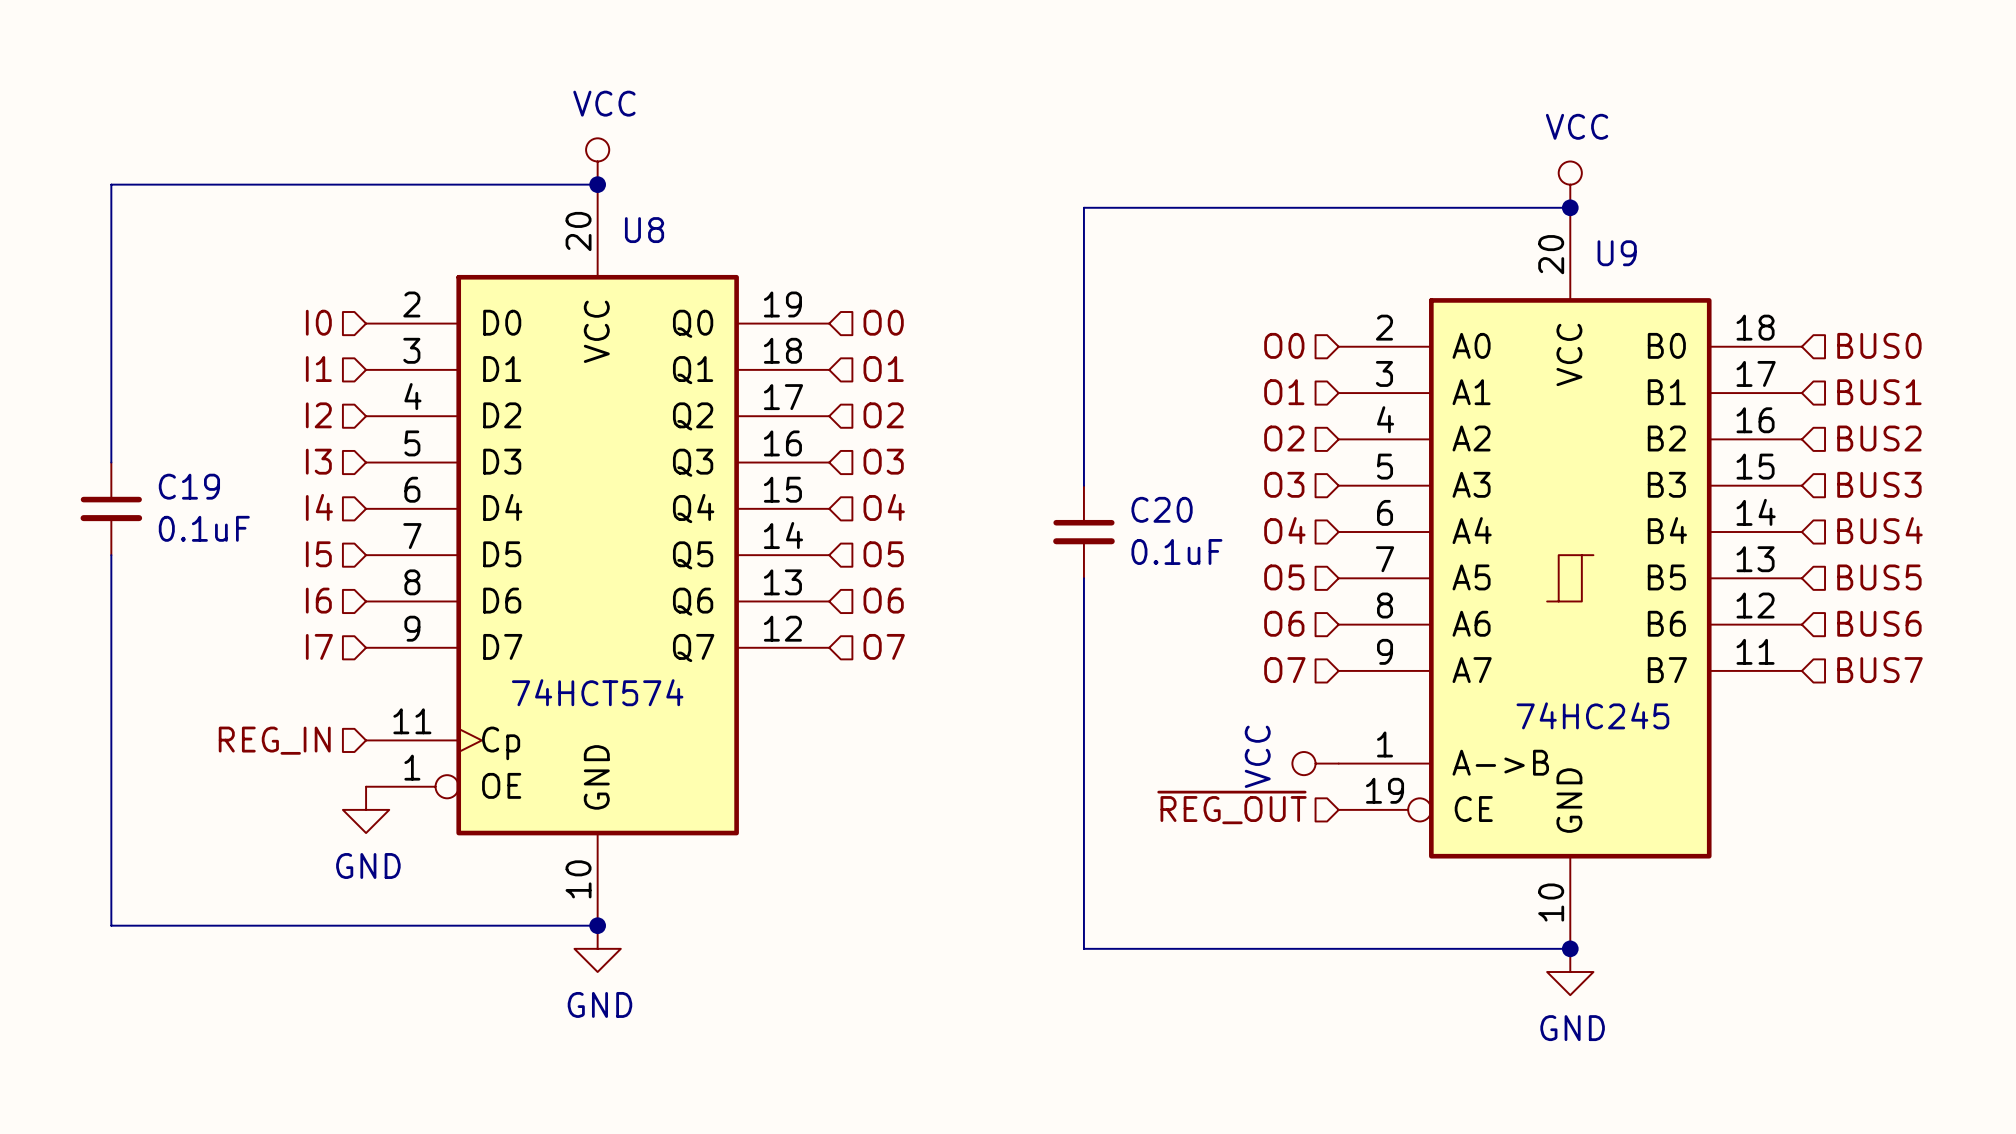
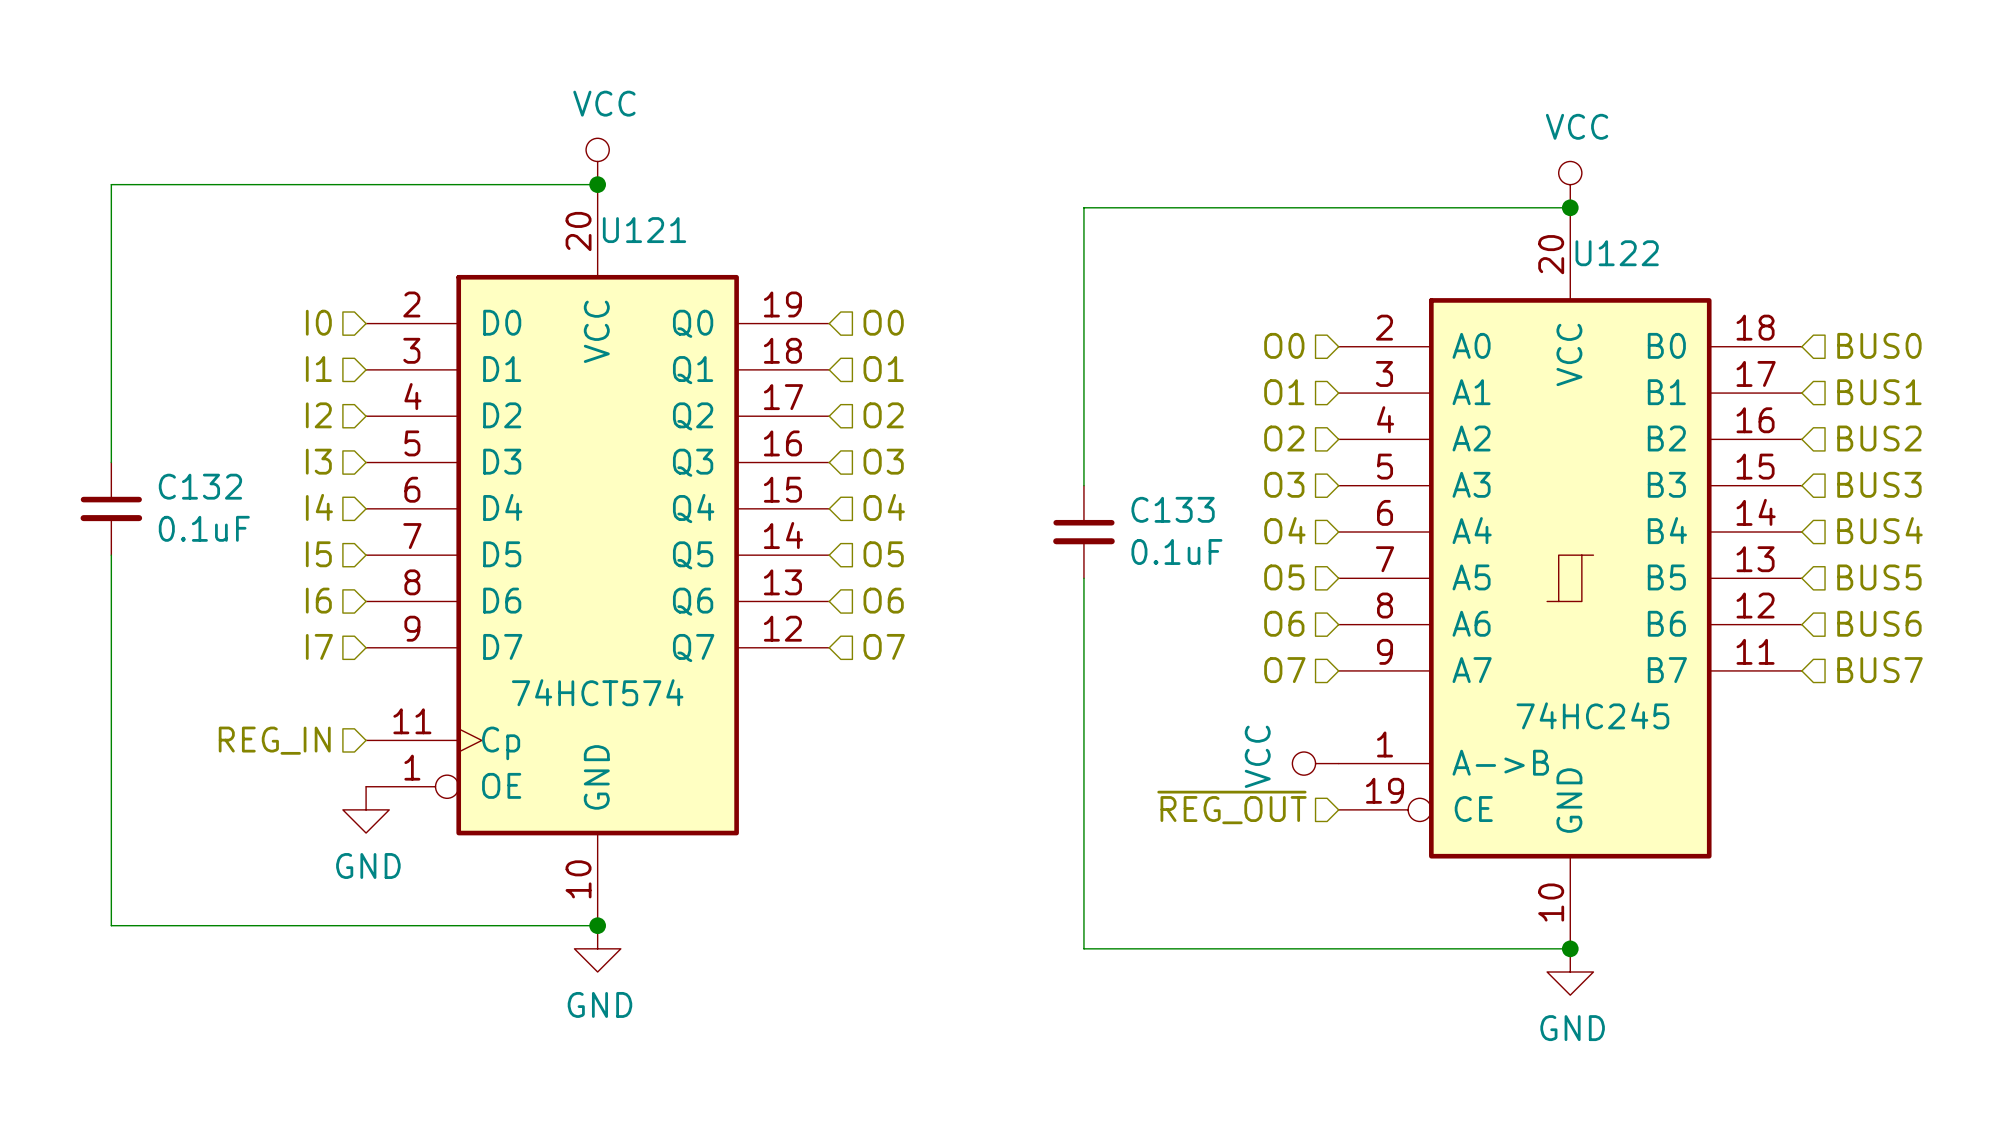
U8 name: U8 (644, 230) -> U121 (644, 230)
U9 name: U9 (1617, 253) -> U122 (1617, 253)
C19 name: C19 (189, 486) -> C132 (200, 486)
C20 name: C20 (1162, 509) -> C133 (1173, 509)

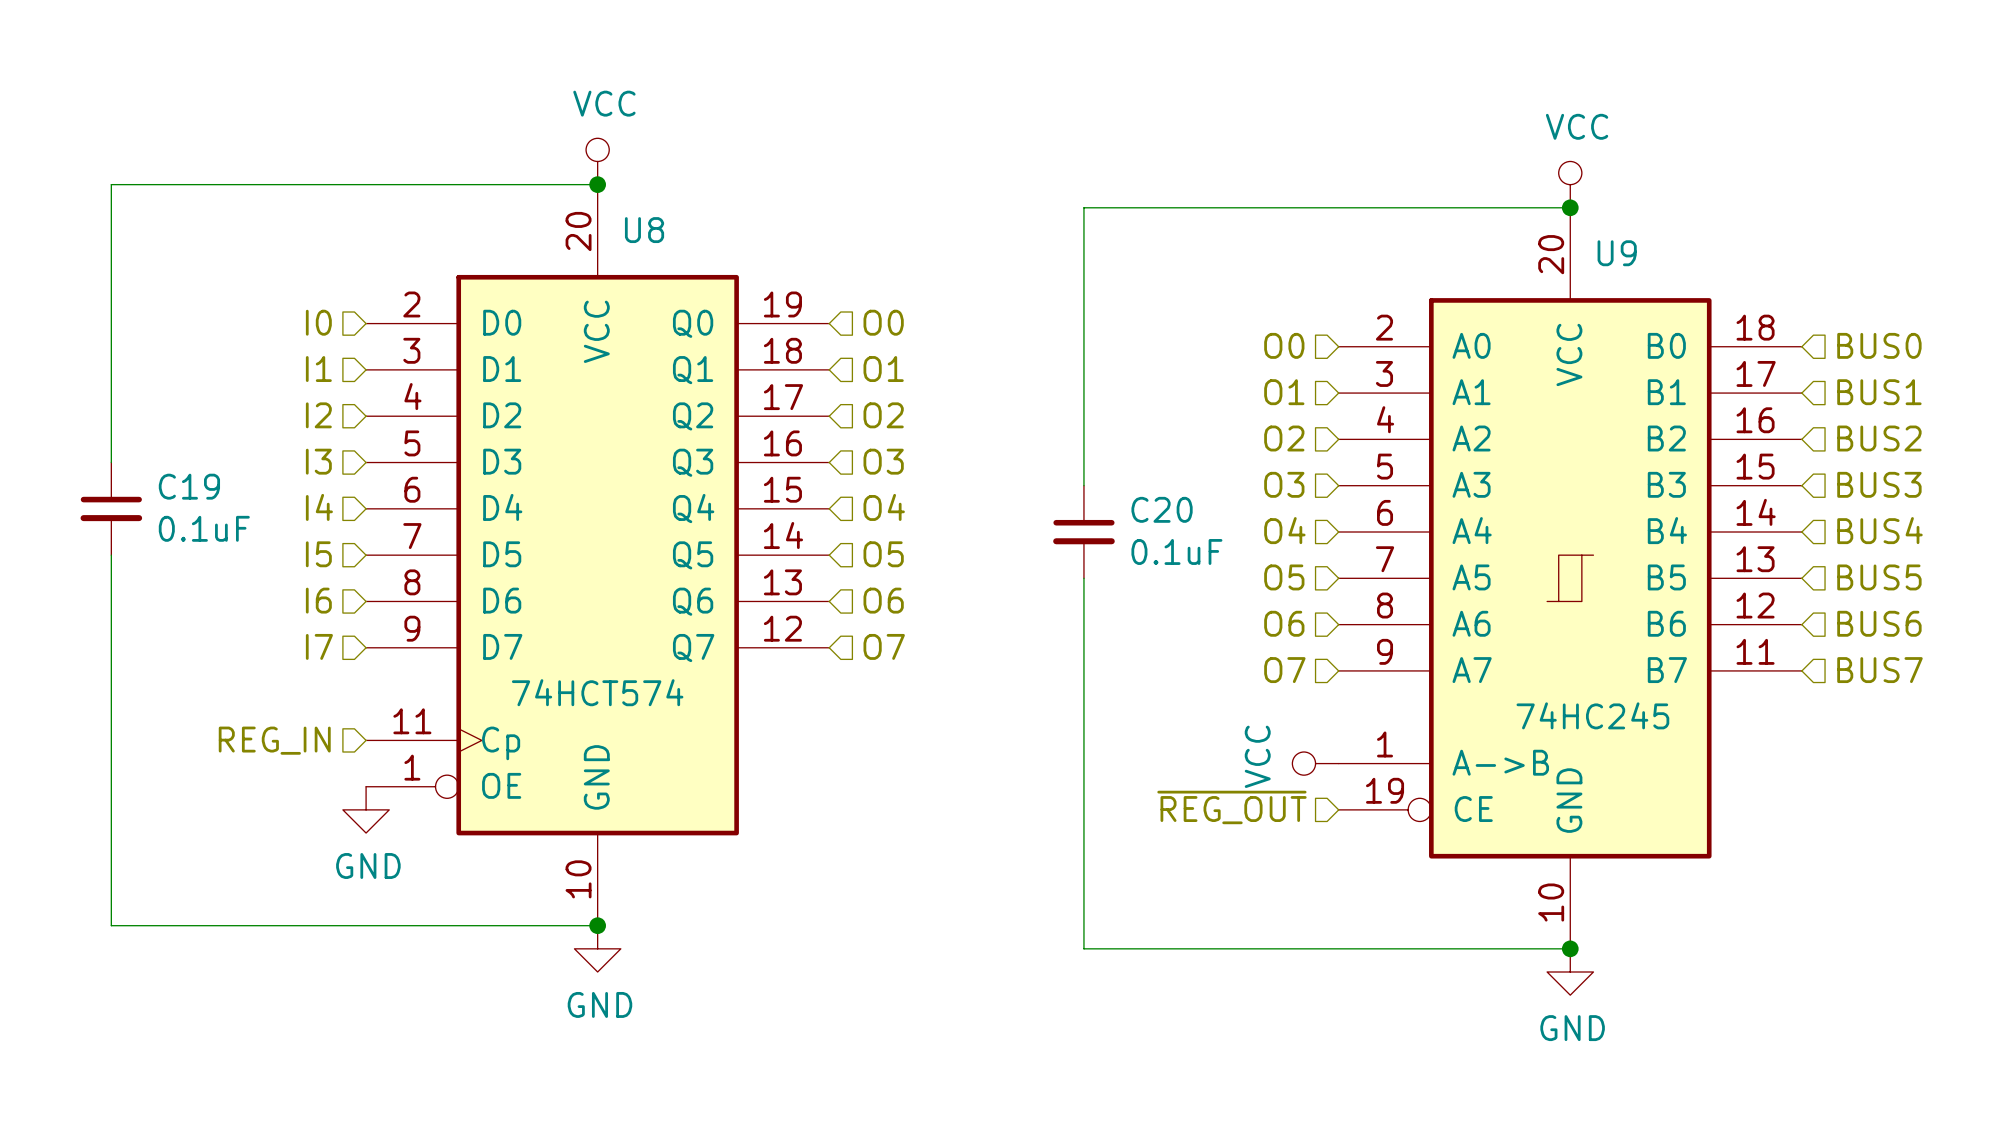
U121 name: U121 (644, 230) -> U8 (644, 230)
U122 name: U122 (1617, 253) -> U9 (1617, 253)
C132 name: C132 (200, 486) -> C19 (189, 486)
C133 name: C133 (1173, 509) -> C20 (1162, 509)

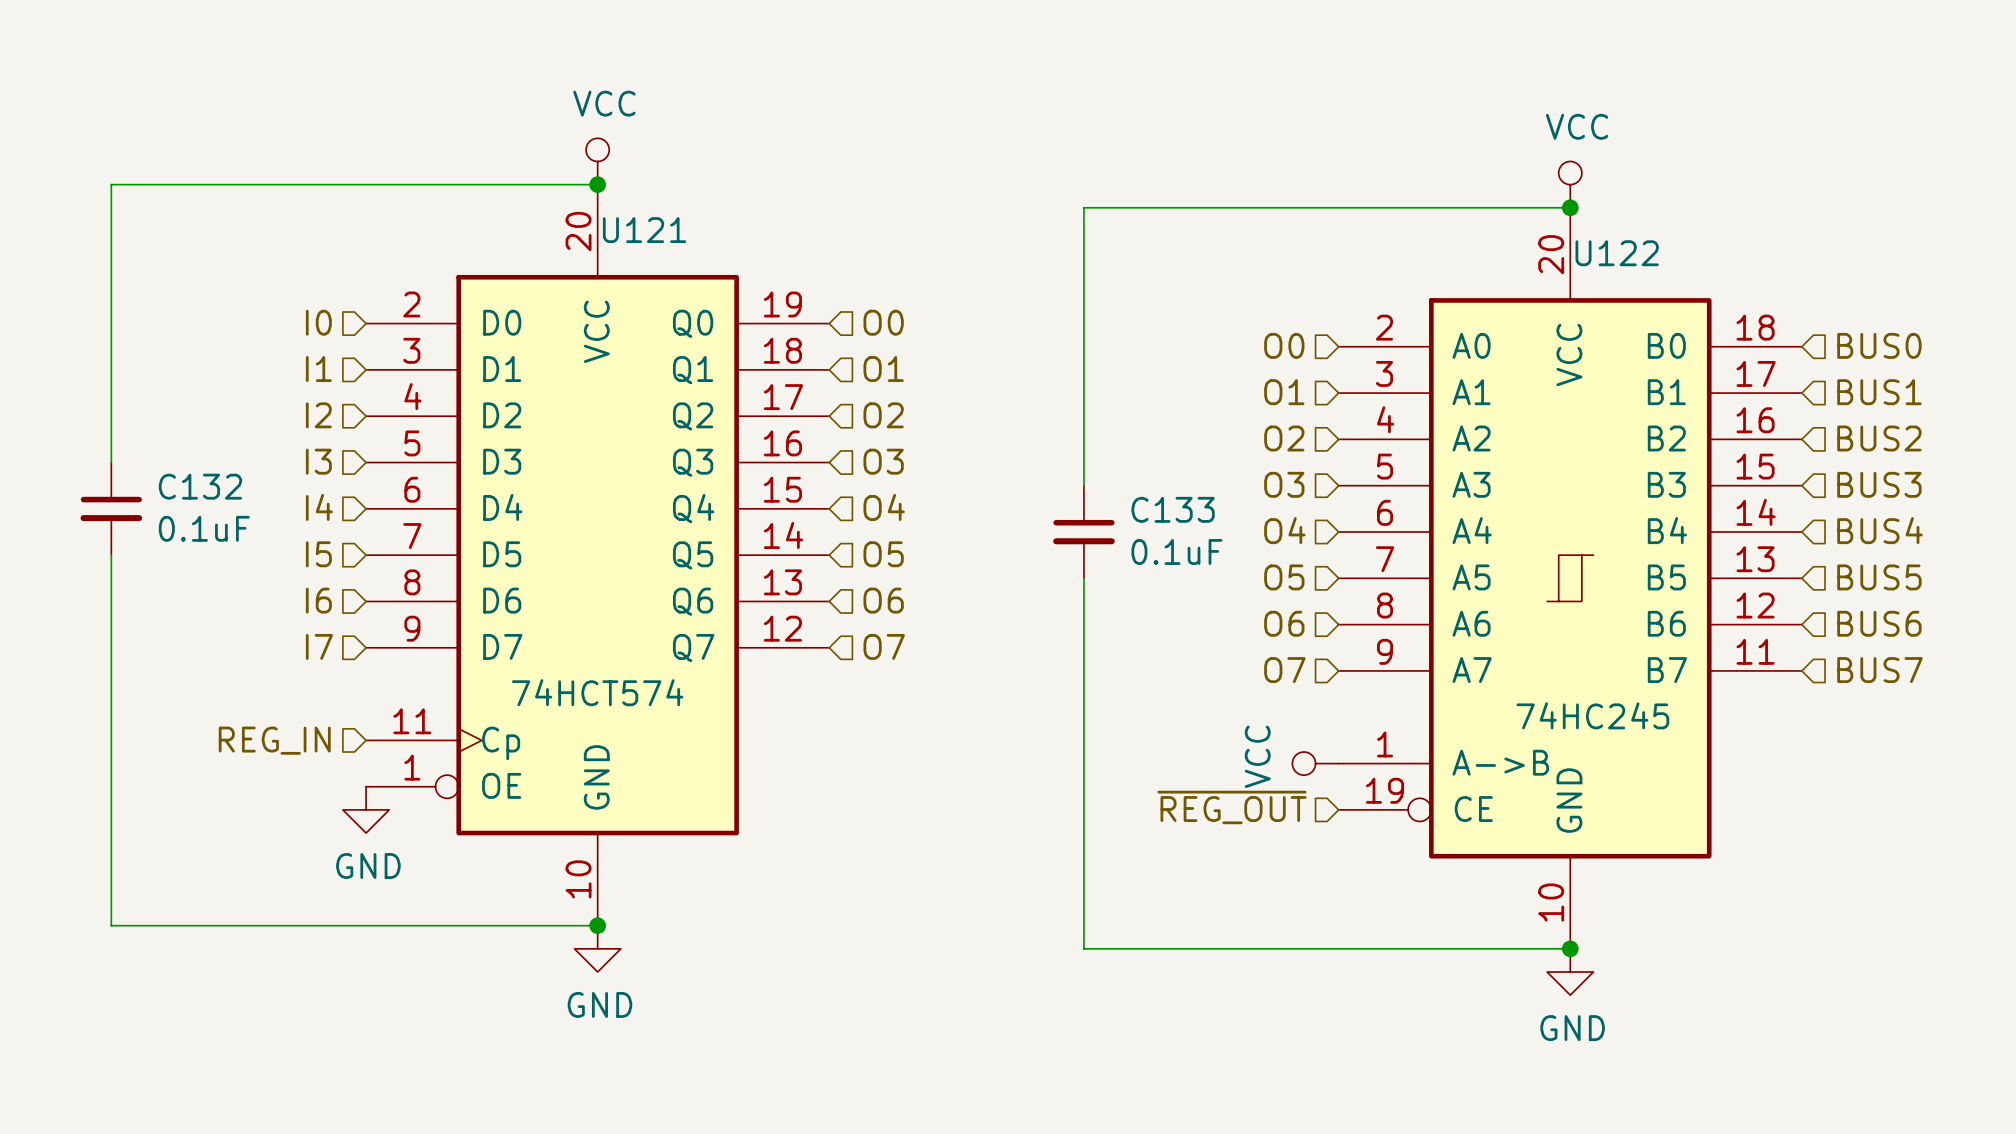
U8 name: U8 (644, 230) -> U121 (644, 230)
U9 name: U9 (1617, 253) -> U122 (1617, 253)
C19 name: C19 (189, 486) -> C132 (200, 486)
C20 name: C20 (1162, 509) -> C133 (1173, 509)

